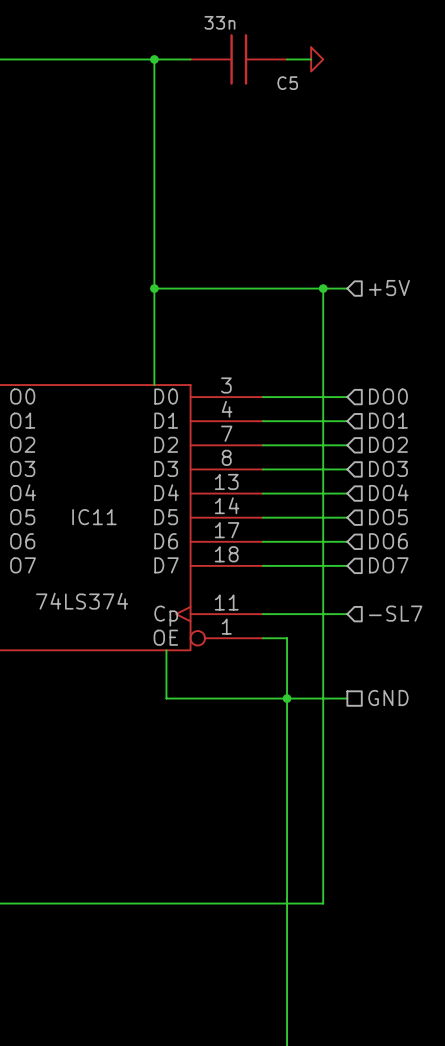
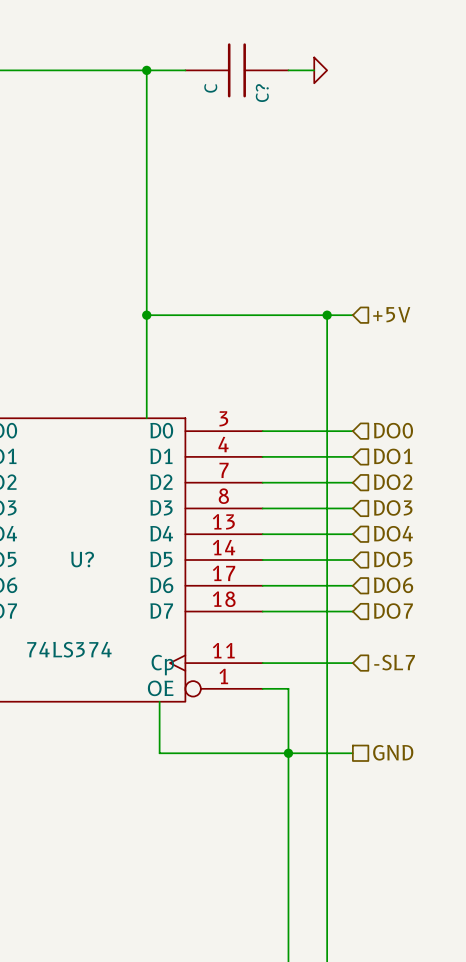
C5 value: 33n (219, 22) -> C (210, 88)
C5 name: C5 (287, 83) -> C? (262, 93)
IC11 name: IC11 (94, 517) -> U? (82, 559)

